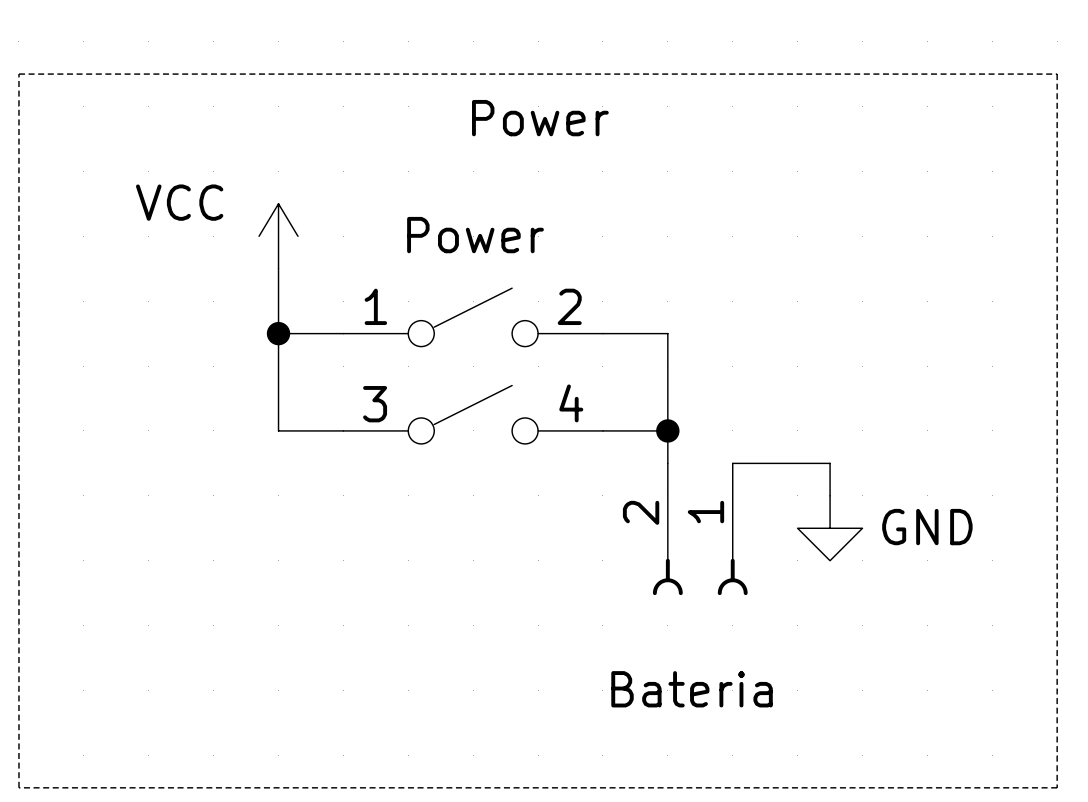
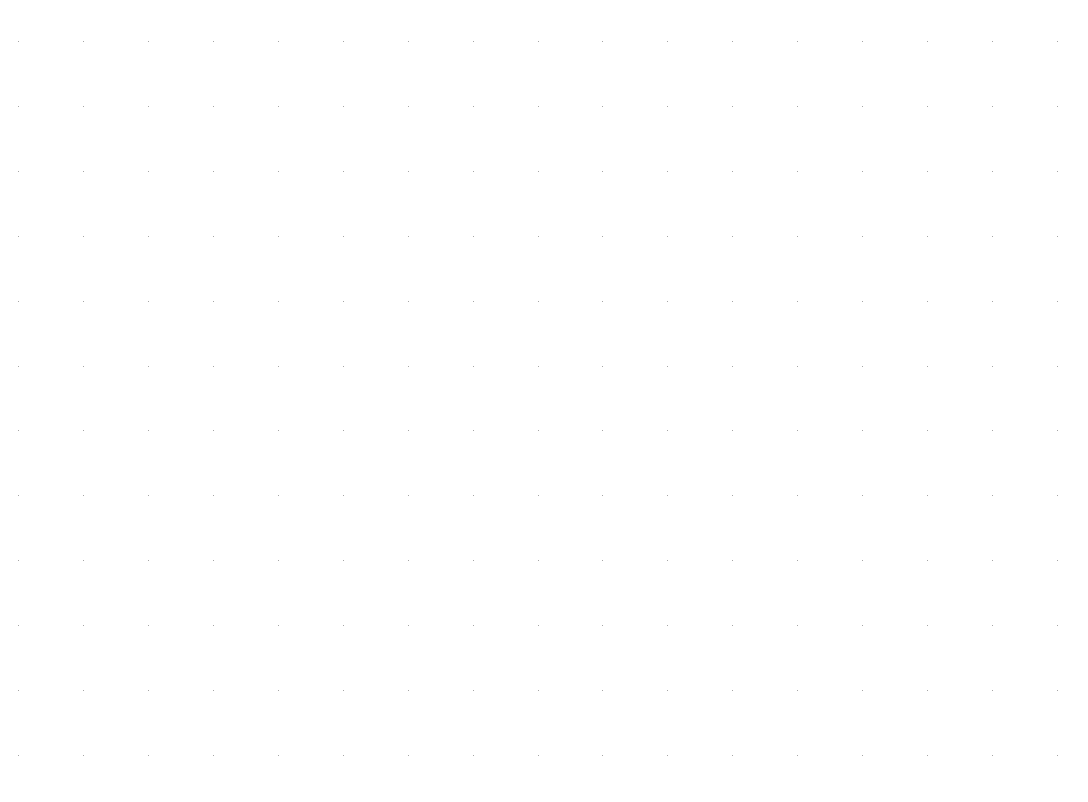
line: (18, 74) (1057, 74) (1057, 787) (18, 787) (18, 74) -> none
text: Power (540, 118) -> none
power symbol: VCC (278, 236) -> none
wire: (278, 268) (278, 430) (343, 430) -> none
part: Power (473, 317) -> none
wire: (278, 333) (343, 333) -> none
junction: (278, 333) -> none
wire: (602, 333) (667, 333) (667, 463) -> none
part: (473, 414) -> none
wire: (602, 430) (667, 430) -> none
junction: (667, 430) -> none
wire: (732, 463) (830, 463) (830, 495) -> none
power symbol: GND (830, 528) -> none
part: Bateria (700, 529) -> none

